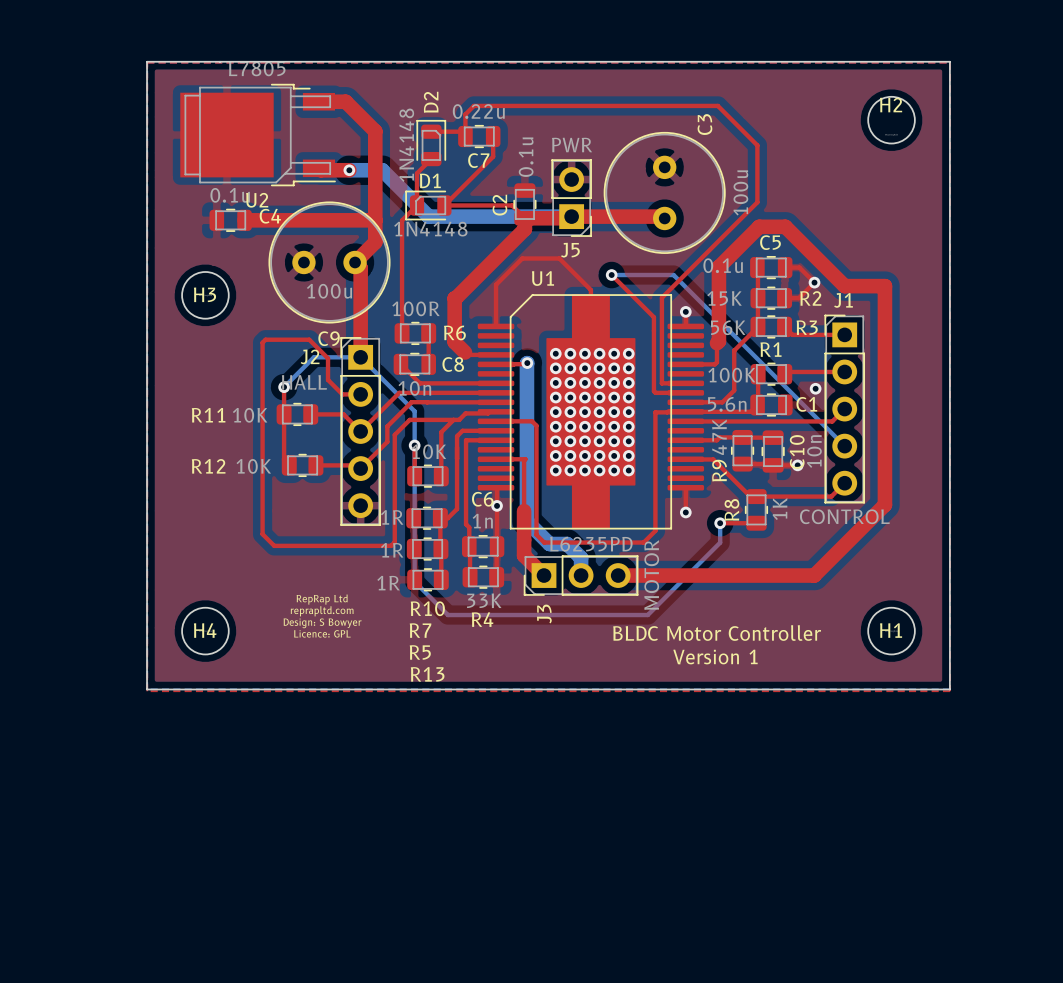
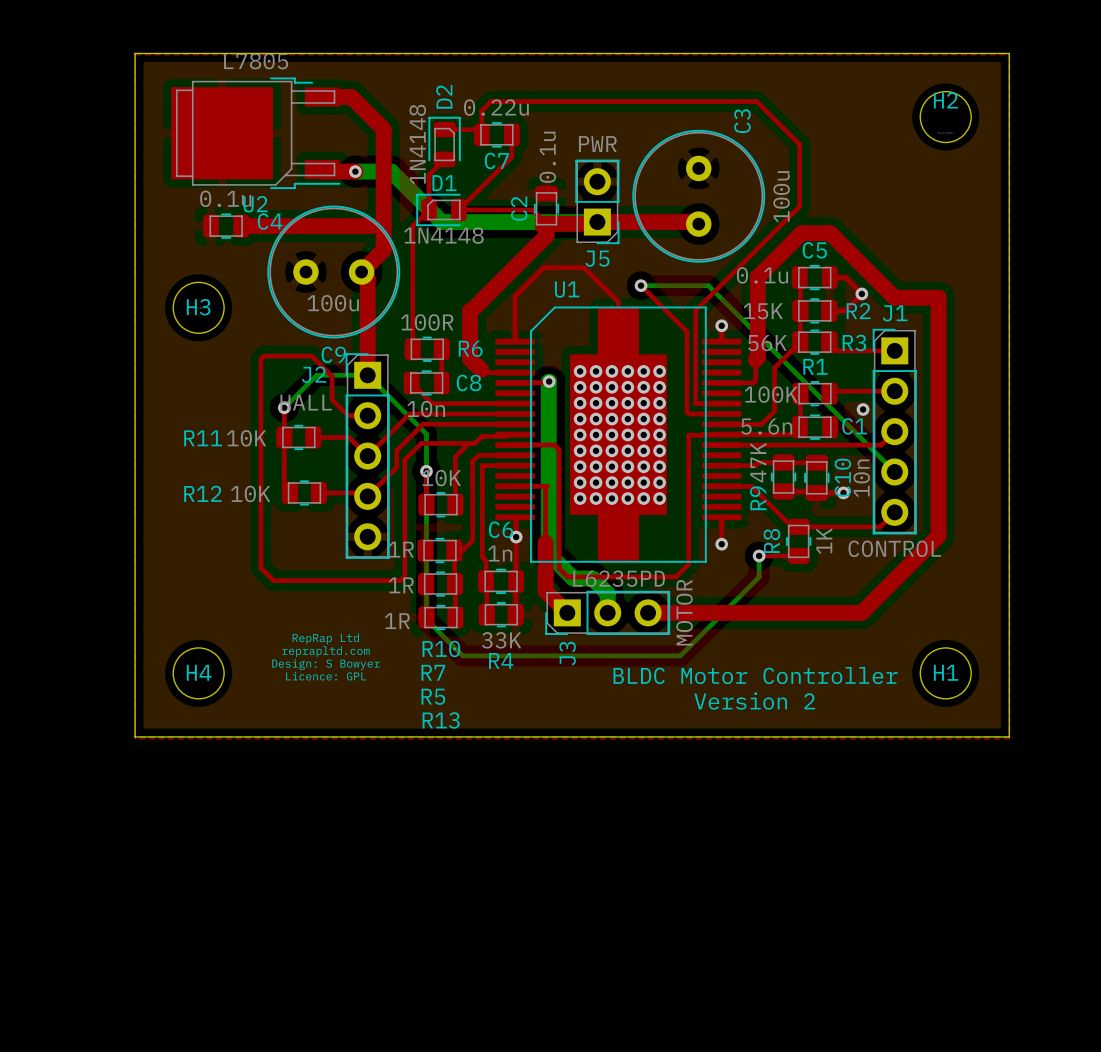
text: Version 1 (715, 656) -> Version 2 (754, 701)

